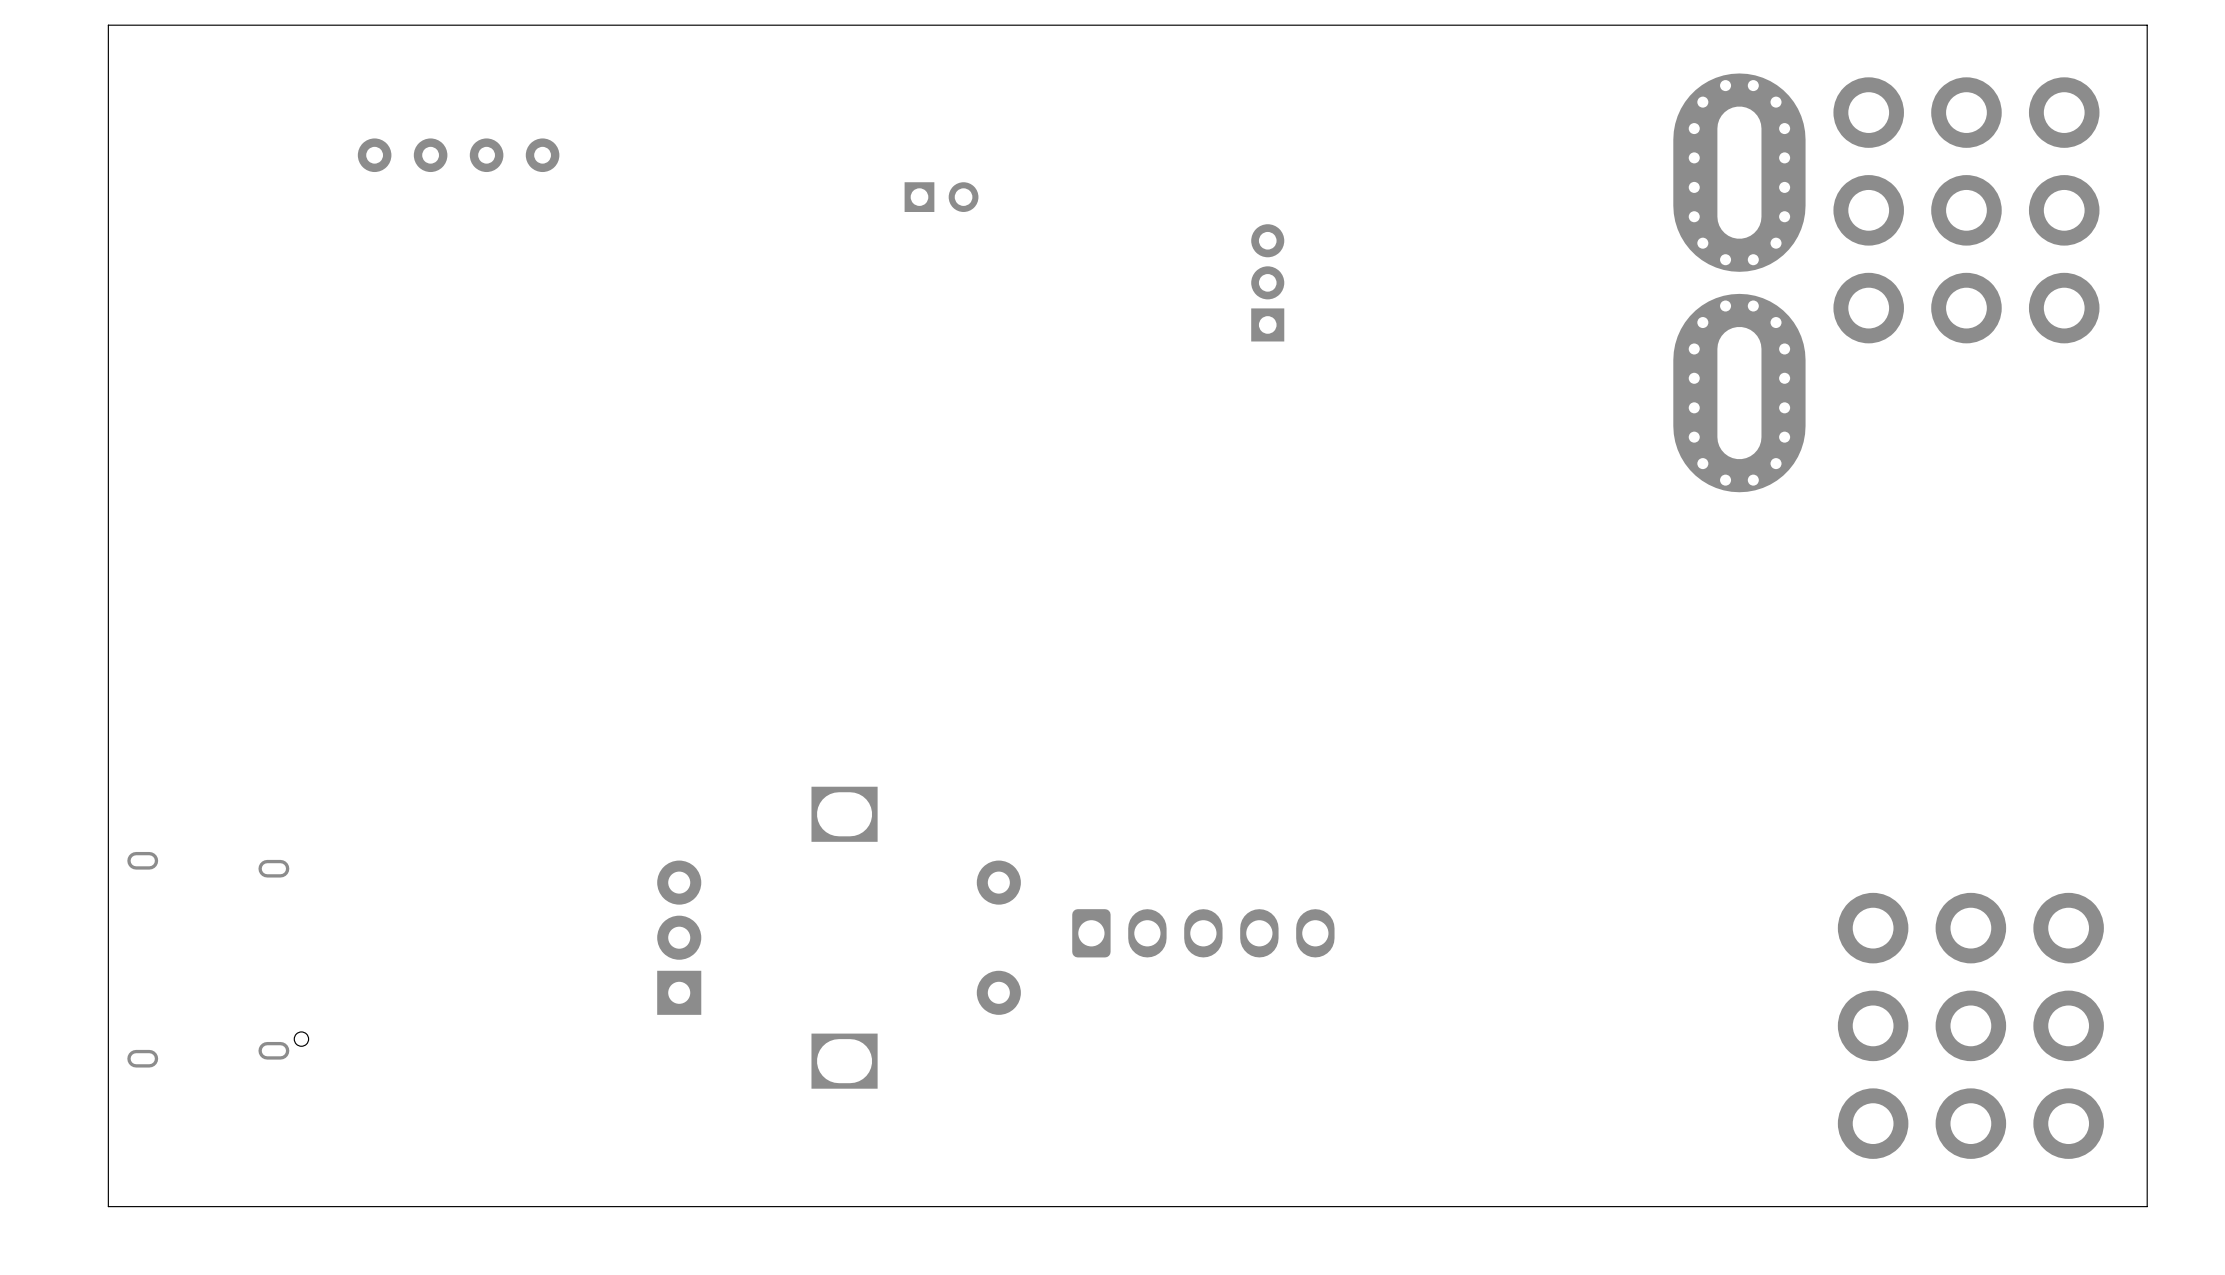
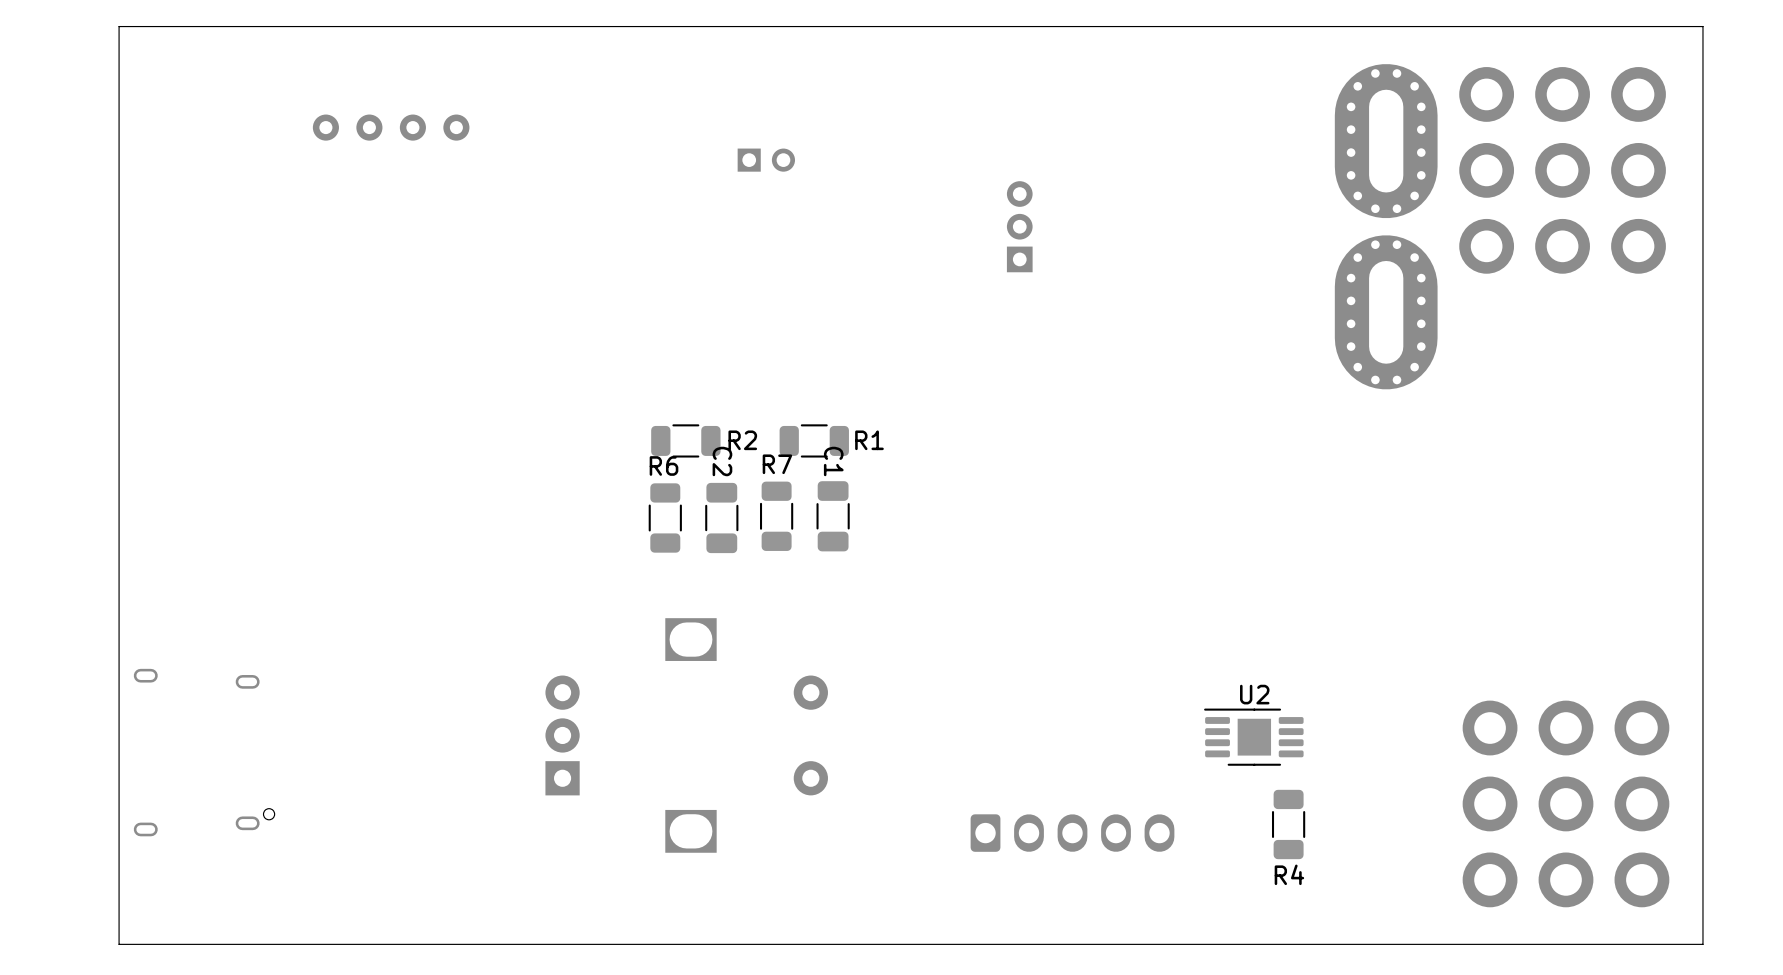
R2: none -> (685, 440)
R1: none -> (814, 440)
R7: none -> (776, 516)
C1: none -> (833, 516)
R6: none -> (665, 517)
C2: none -> (721, 517)
part position: (1203, 933) -> (1072, 833)
U2: none -> (1253, 737)
R4: none -> (1288, 824)

